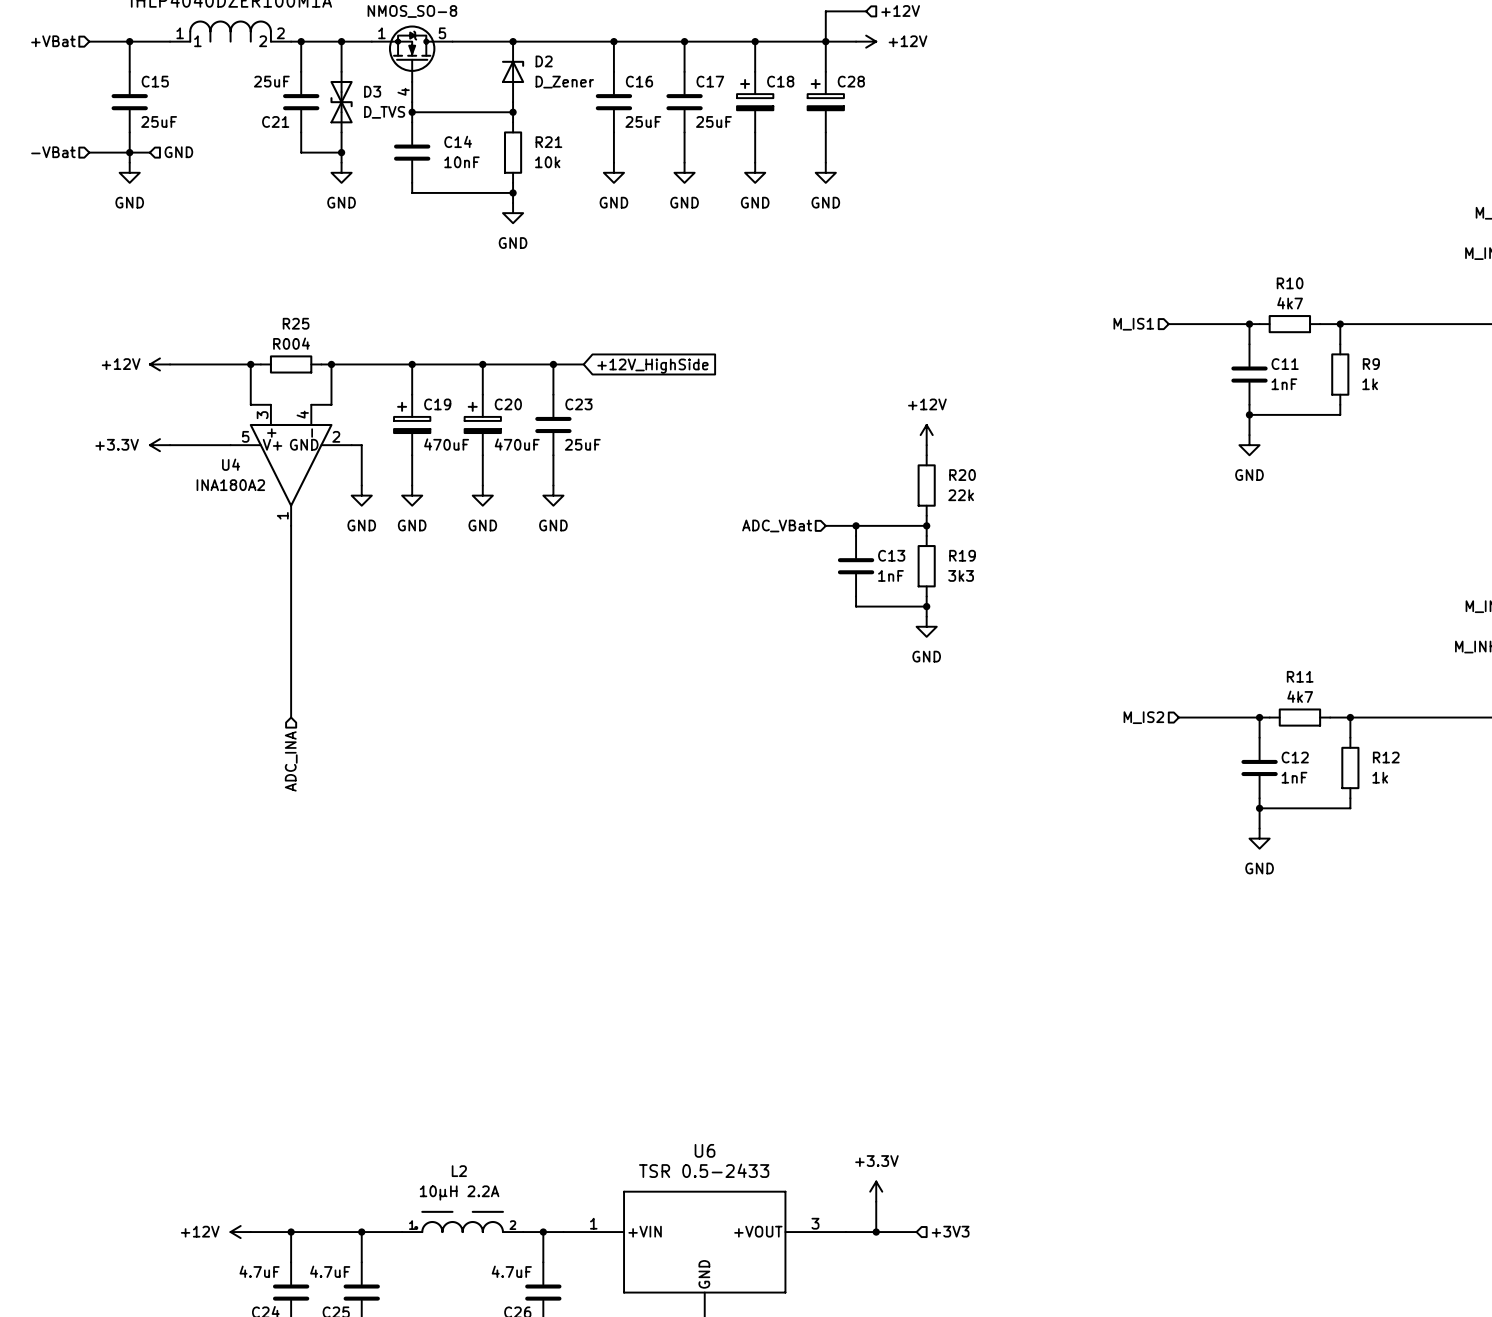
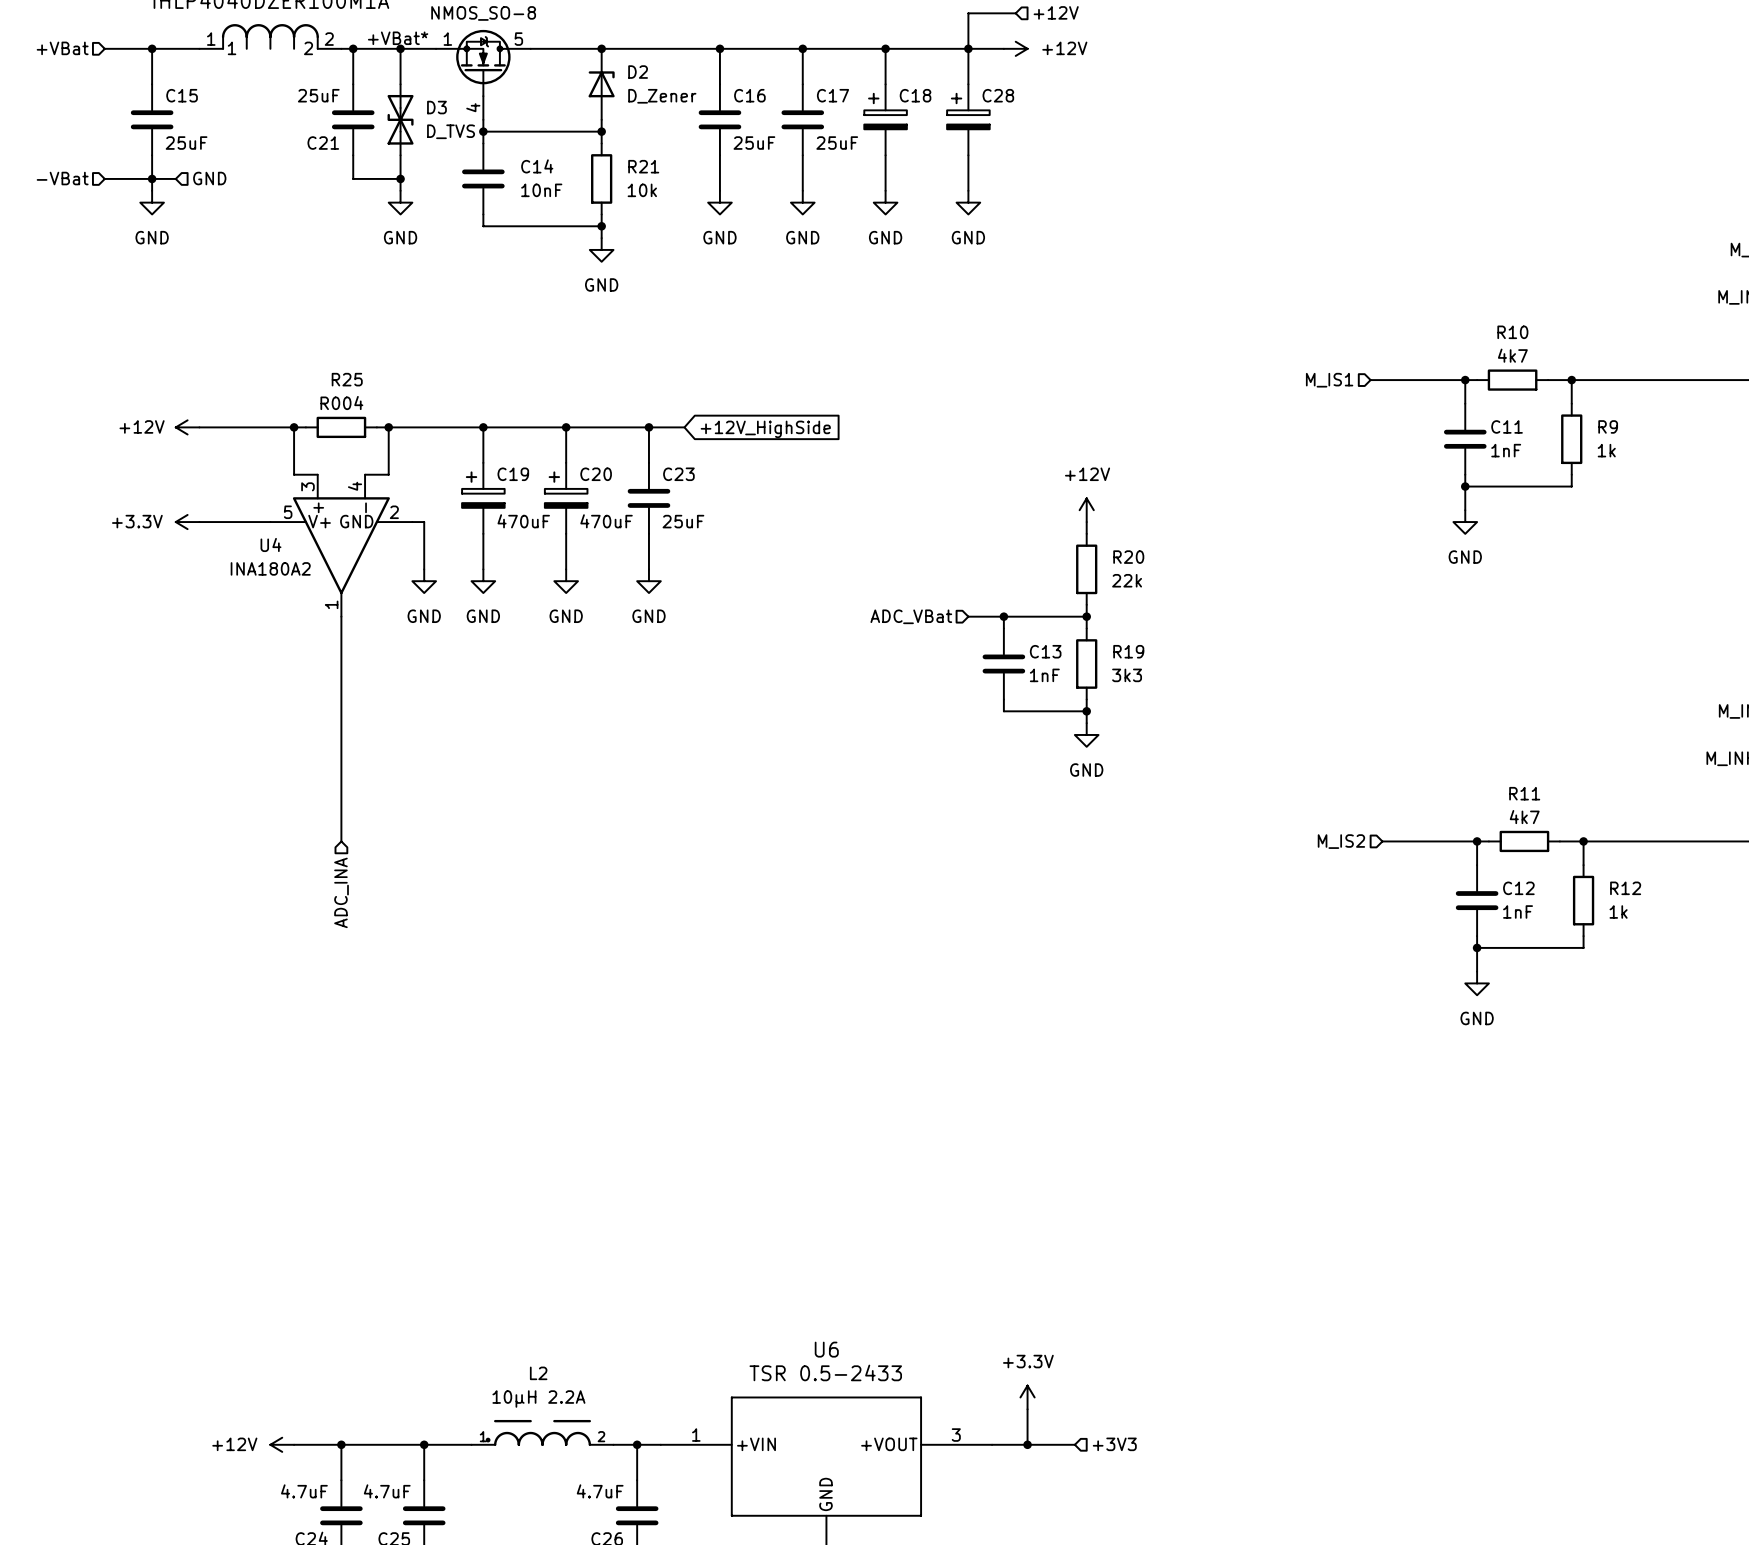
label: none -> +VBat* (398, 38)

